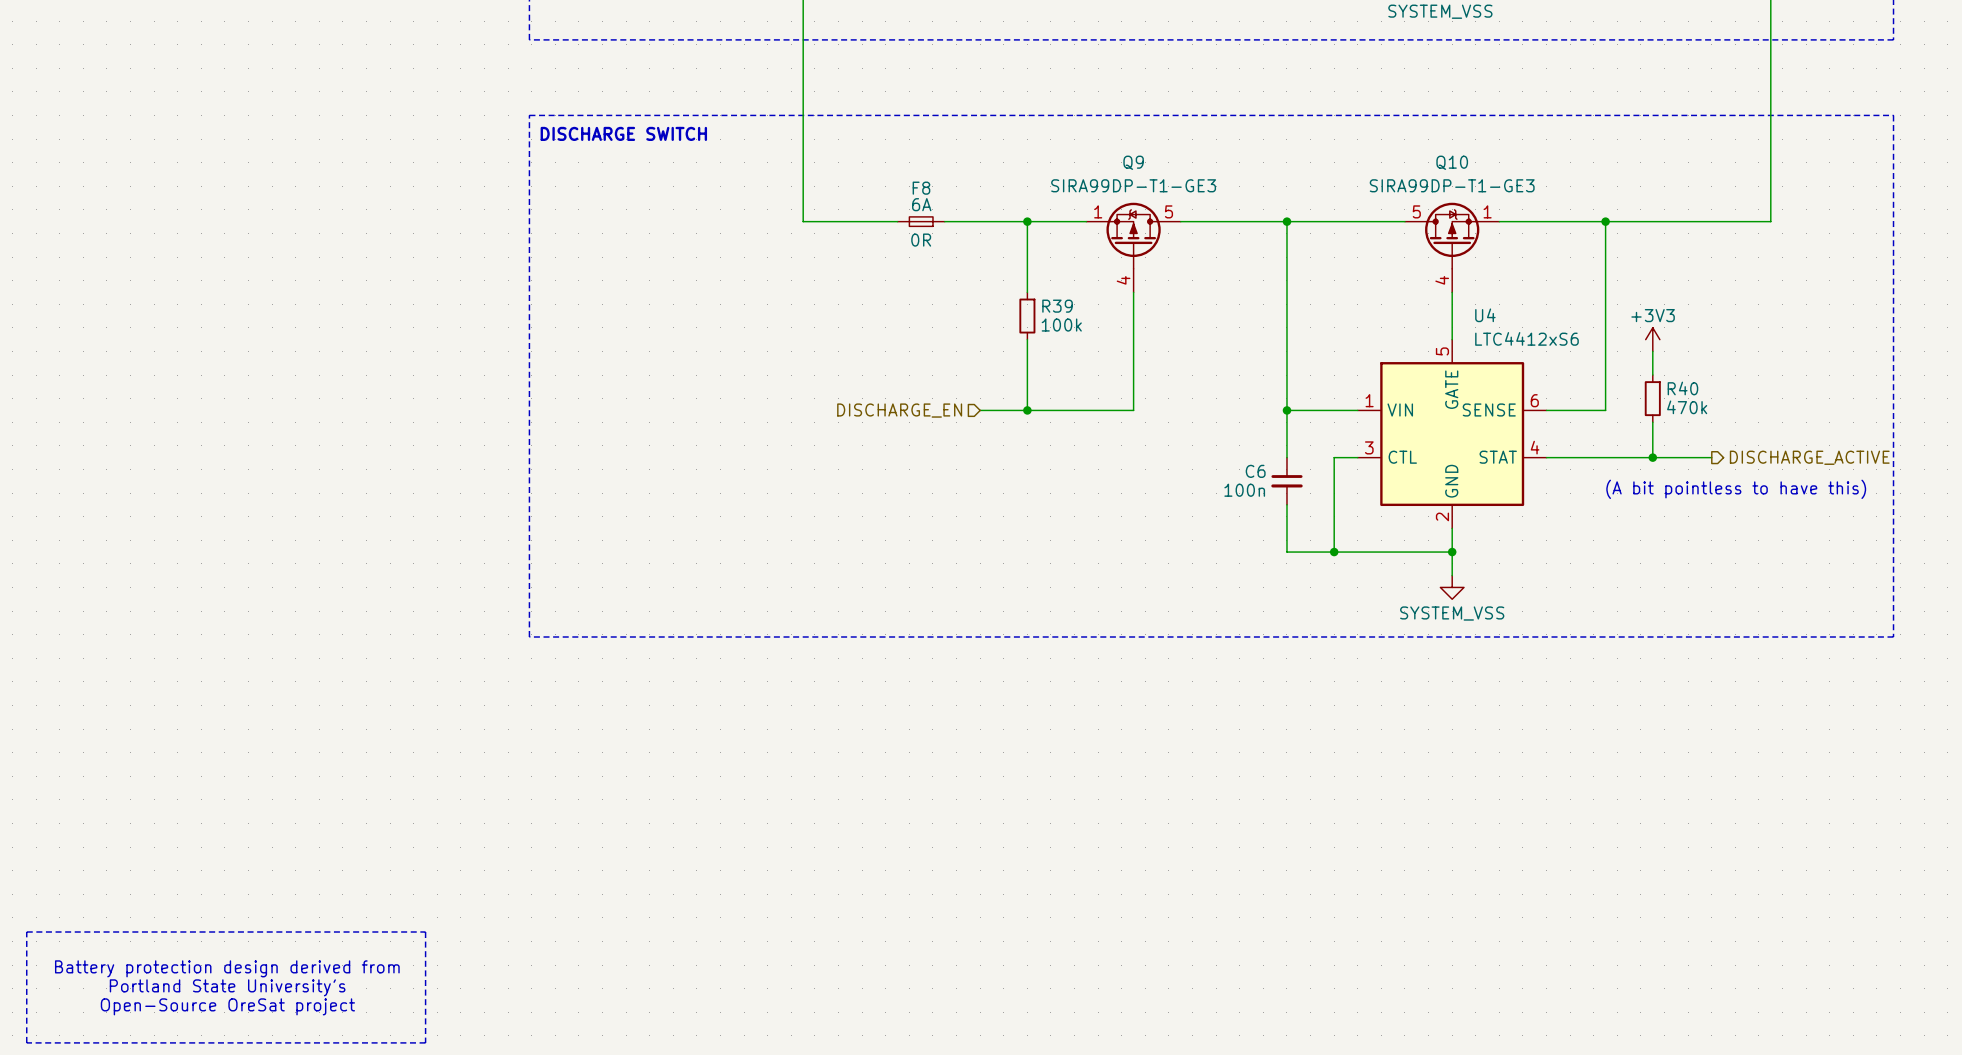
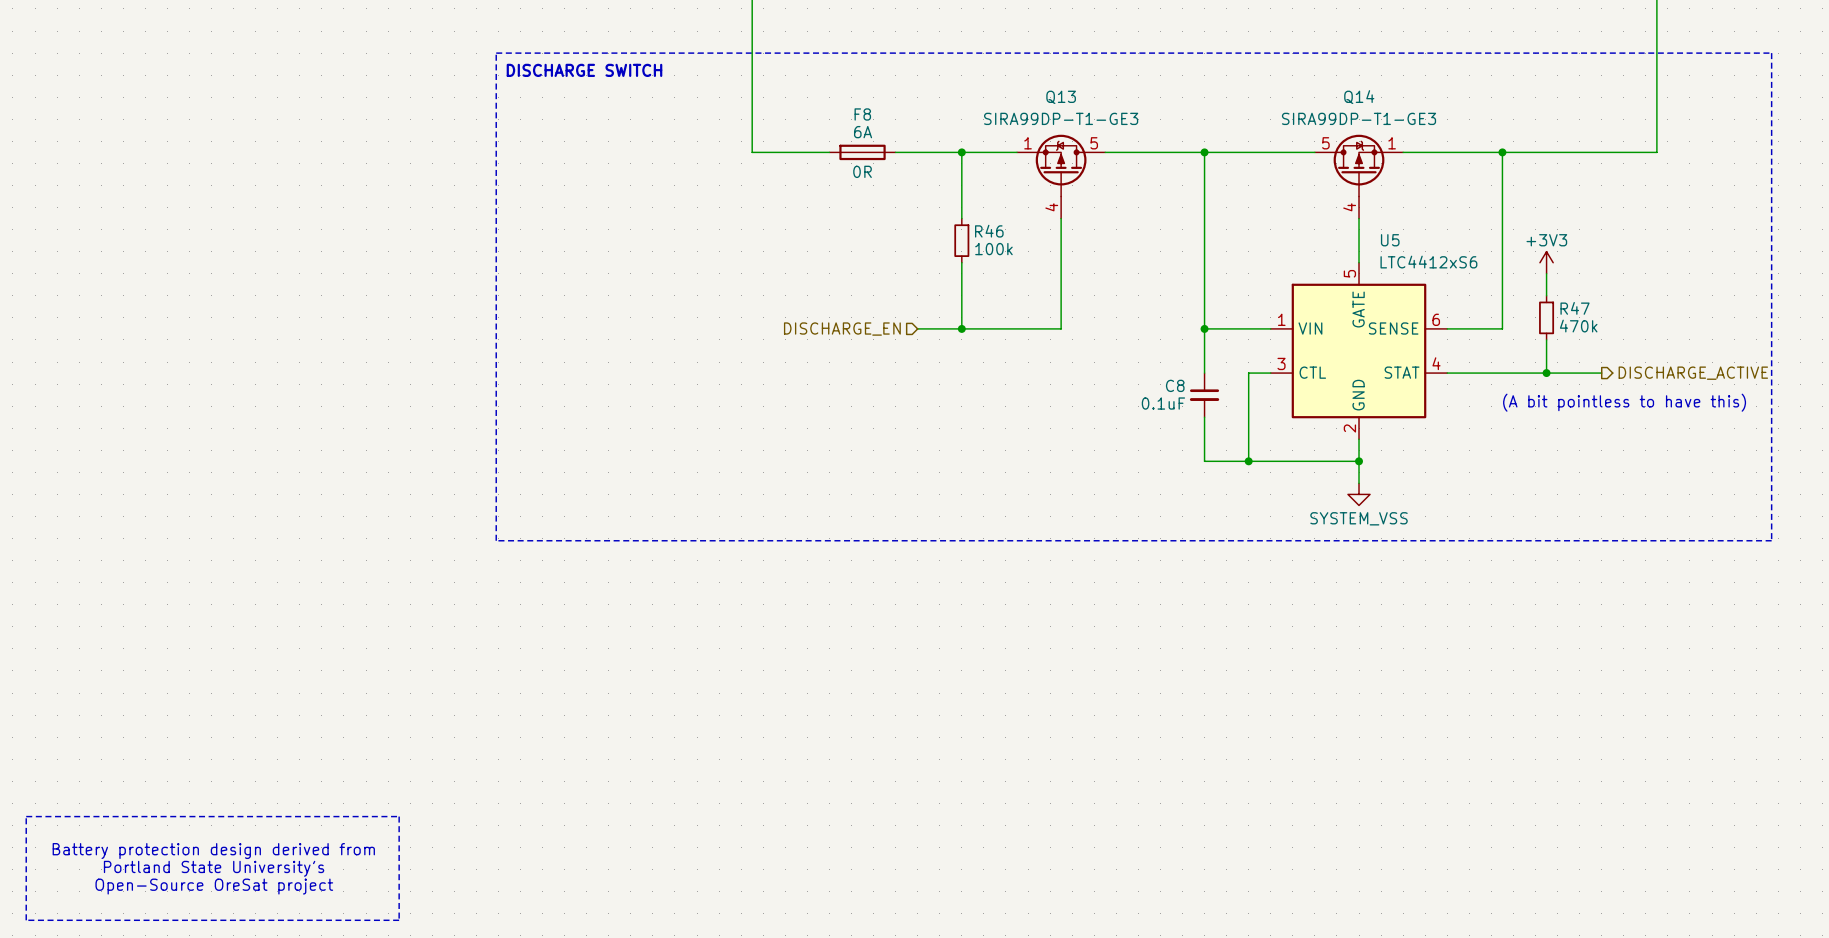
Q9 name: Q9 (1133, 162) -> Q13 (1061, 97)
Q10 name: Q10 (1452, 162) -> Q14 (1359, 97)
F8 symbol: [897, 216, 945, 227] -> [829, 144, 896, 161]
R39 name: R39 (1057, 306) -> R46 (989, 231)
U4 name: U4 (1485, 315) -> U5 (1390, 240)
R40 name: R40 (1682, 388) -> R47 (1575, 308)
C6 name: C6 (1255, 471) -> C8 (1175, 385)
C6 value: 100n (1244, 490) -> 0.1uF (1163, 403)

